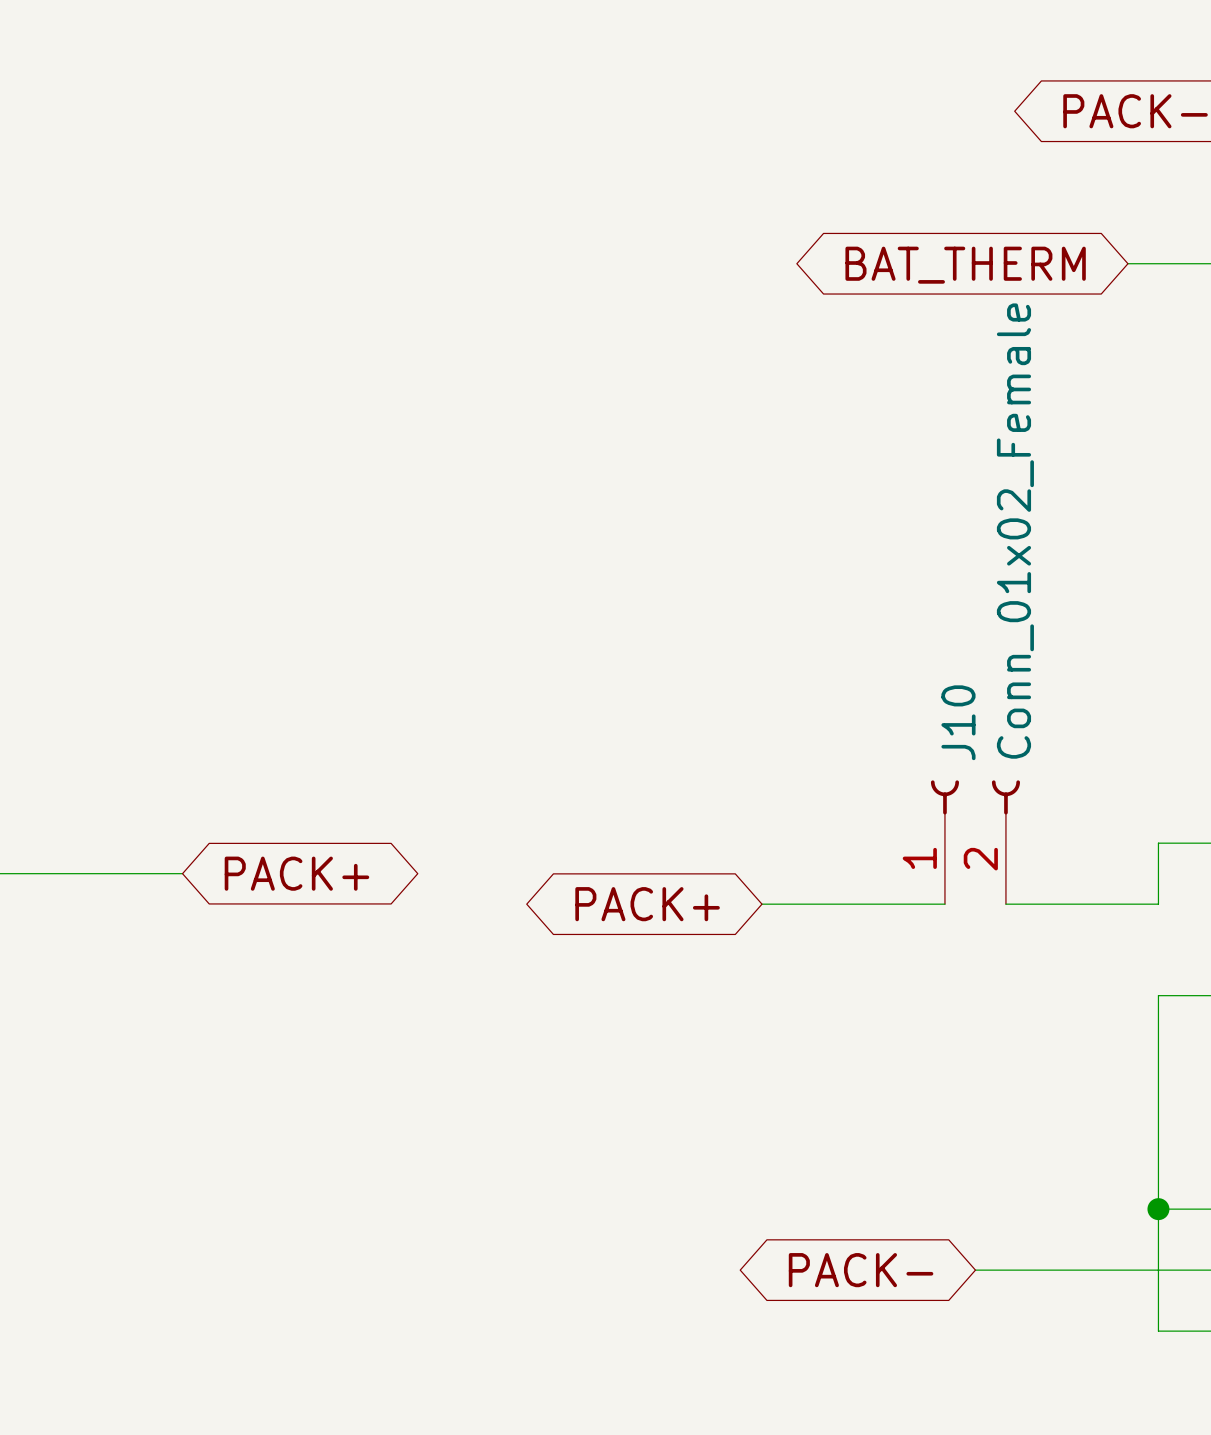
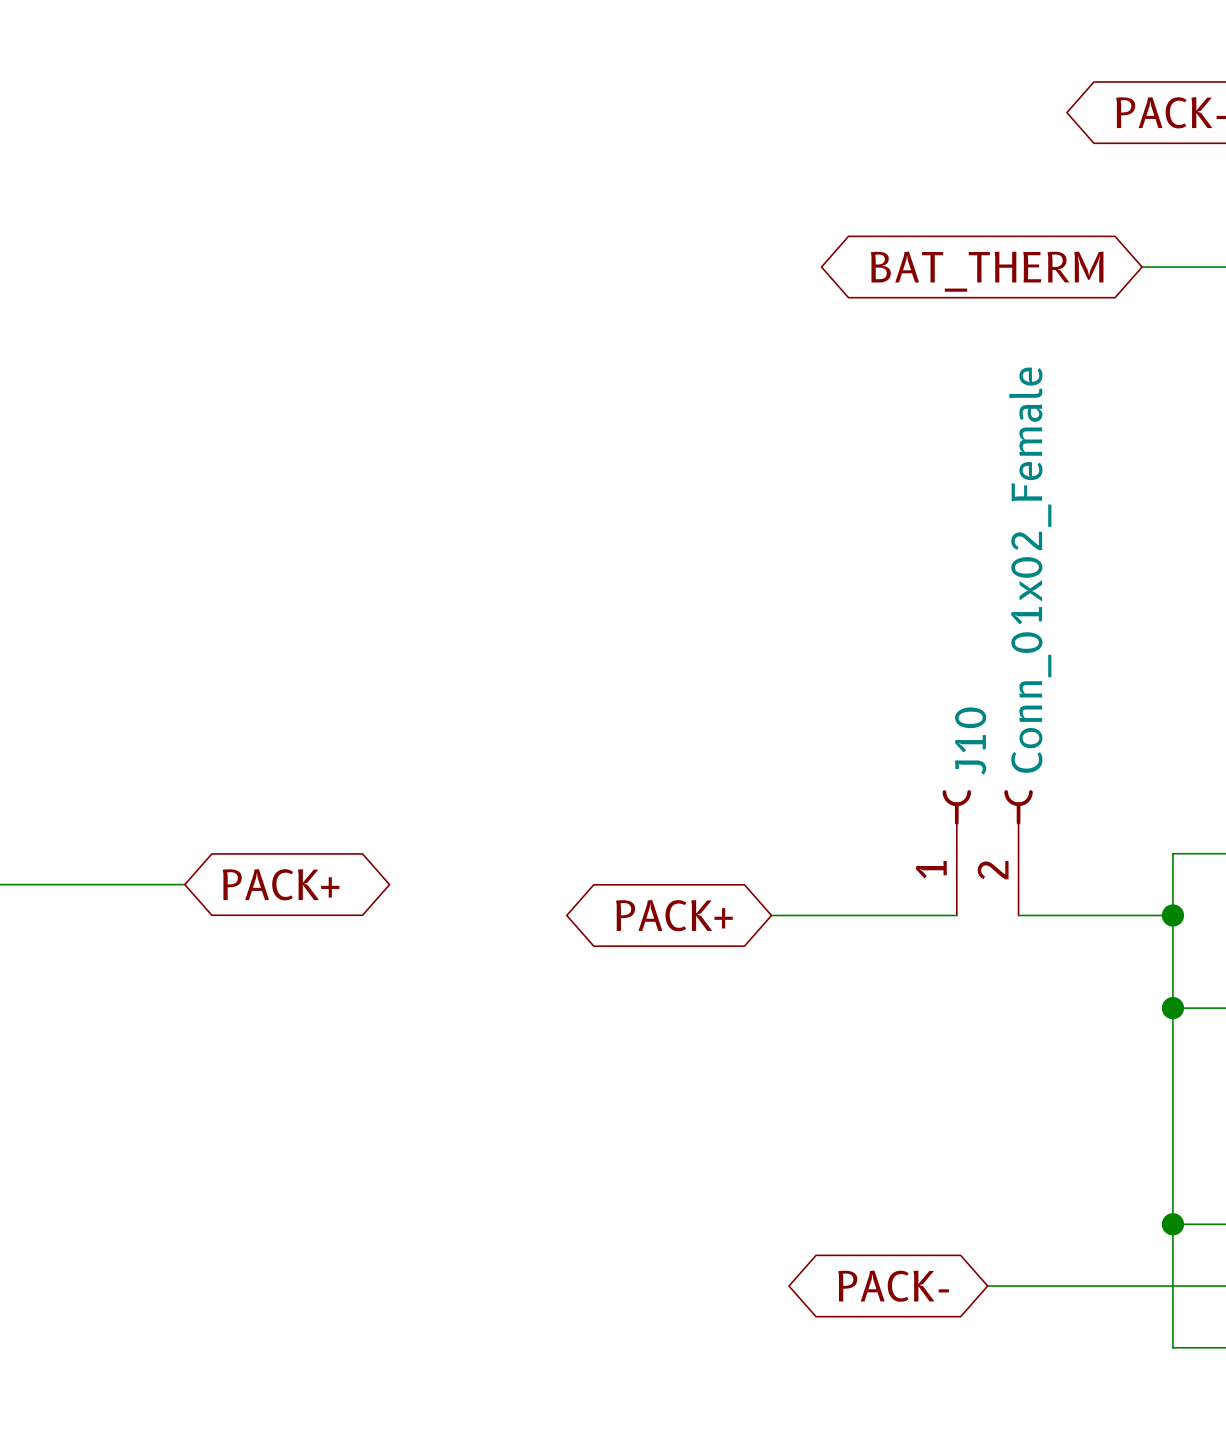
wire: none -> (1172, 915) (1172, 1008)
junction: none -> (1172, 915)
junction: none -> (1172, 1008)

